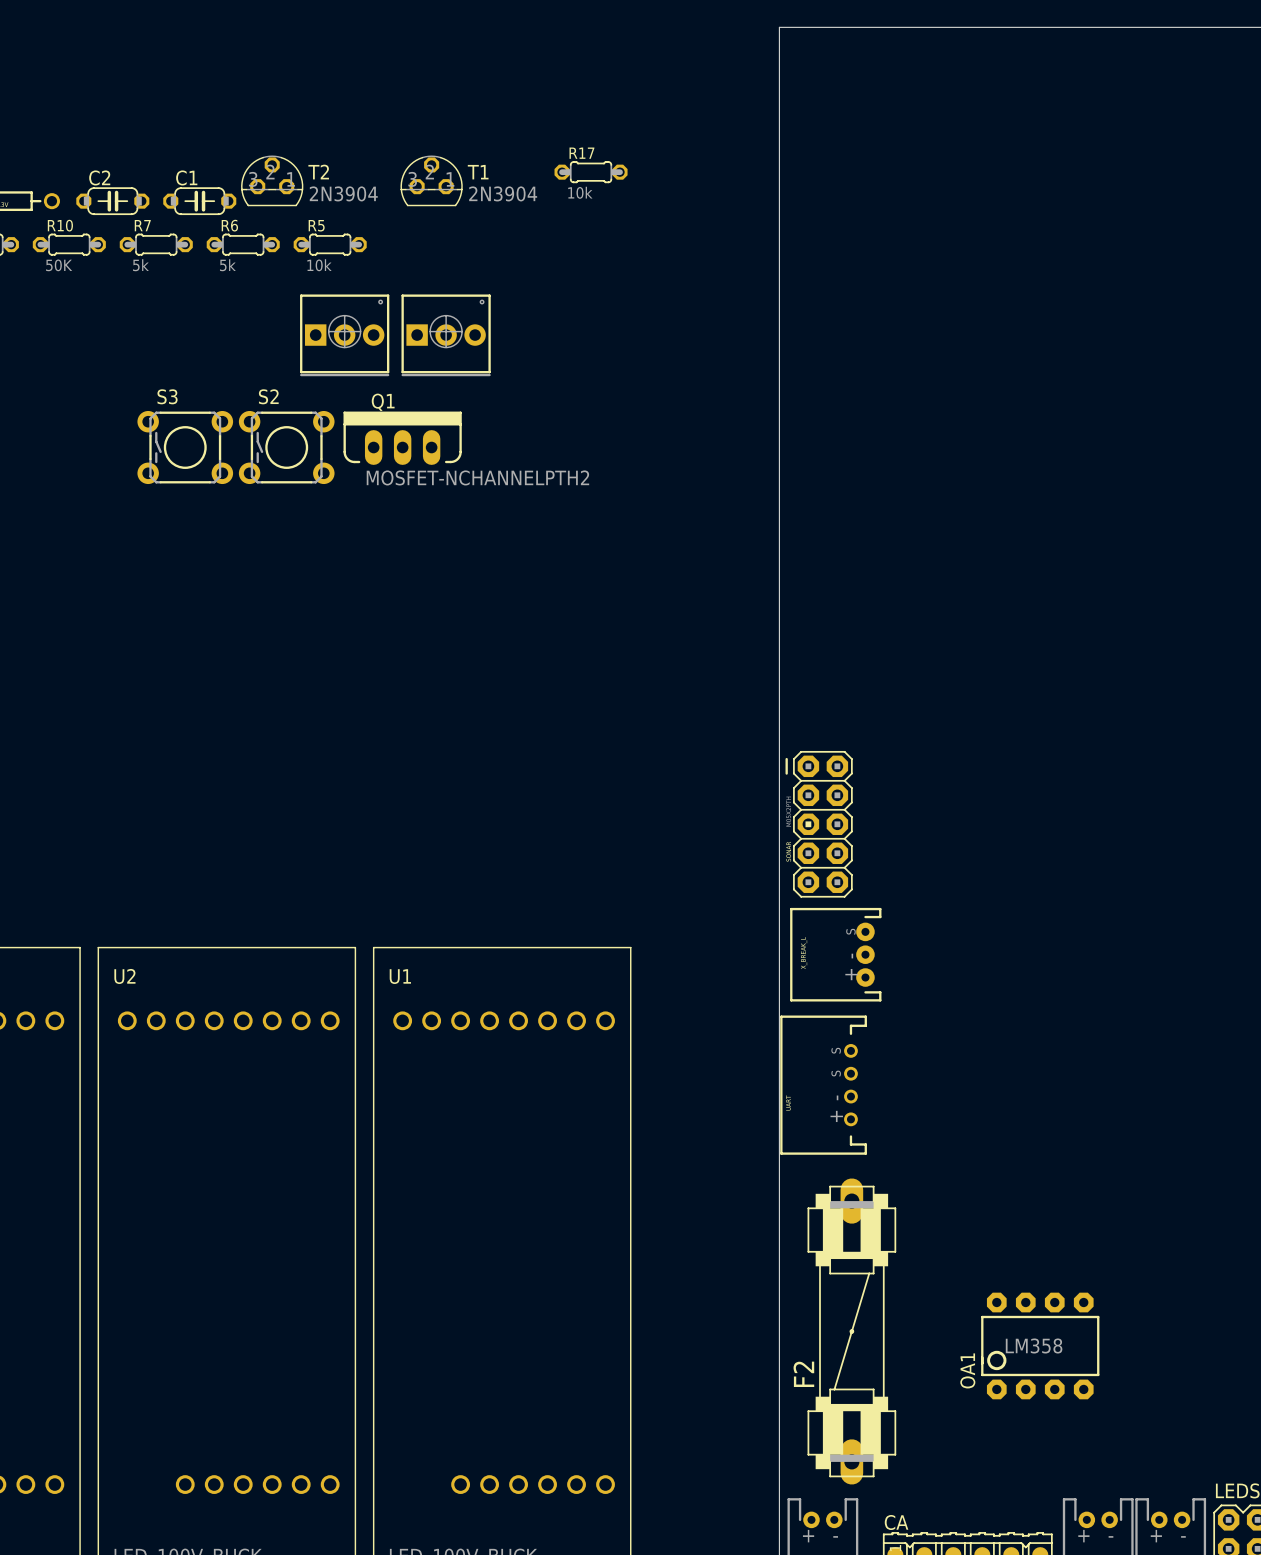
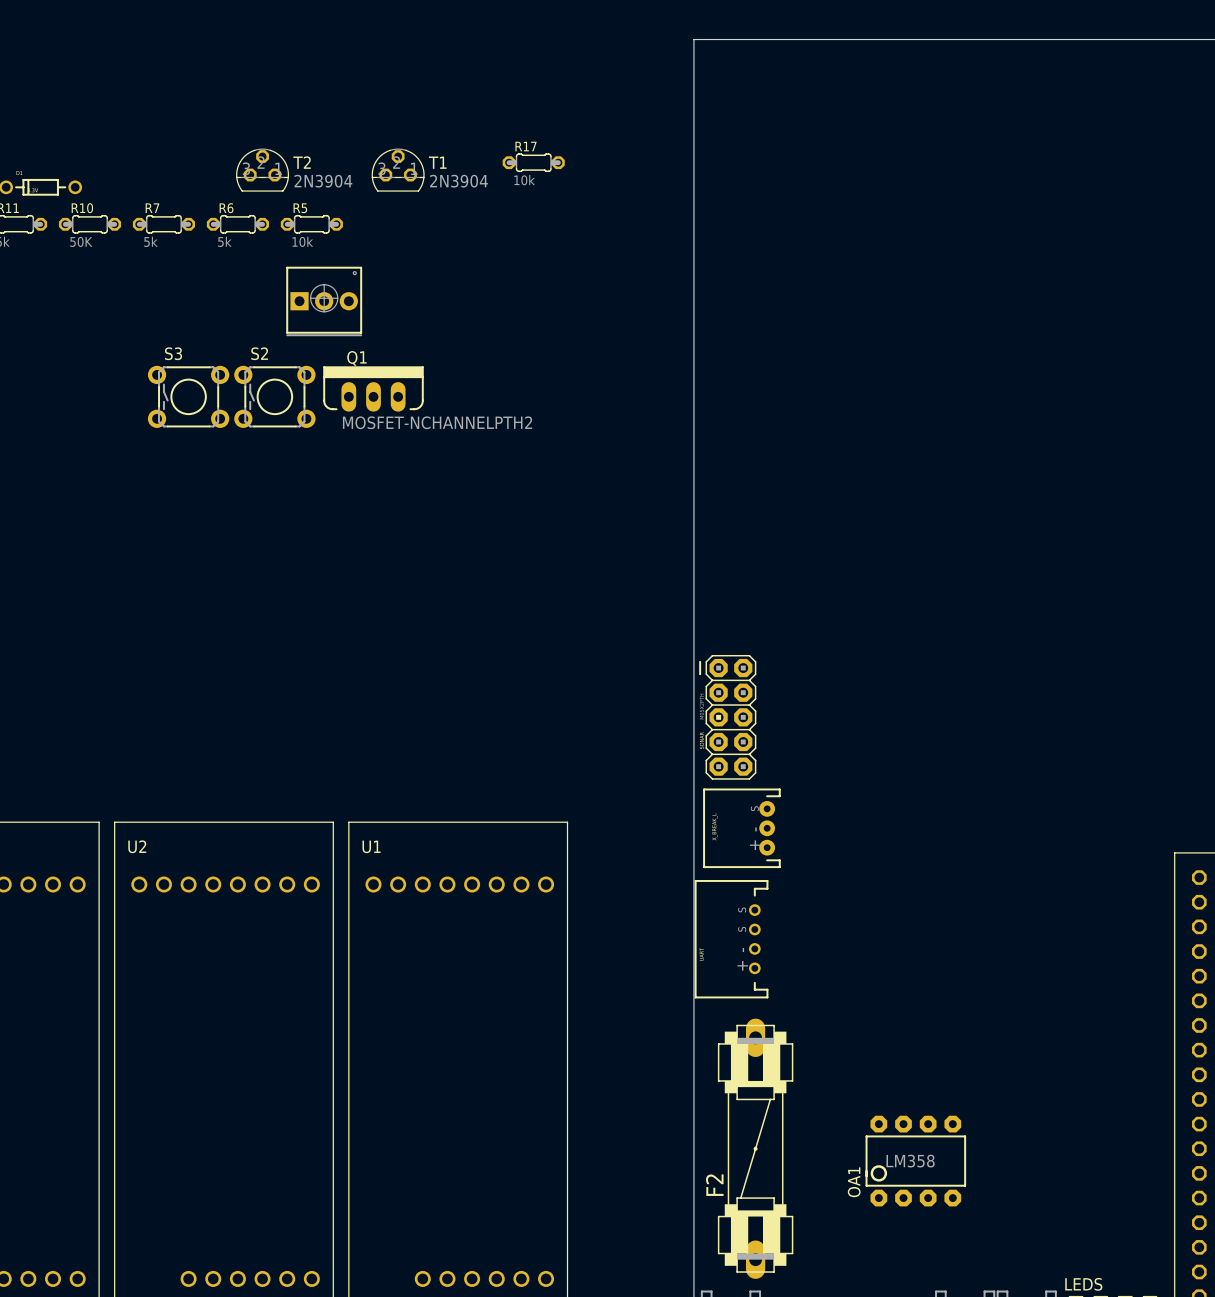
C2: (112, 201) -> none
C1: (199, 201) -> none
part: (446, 335) -> none

